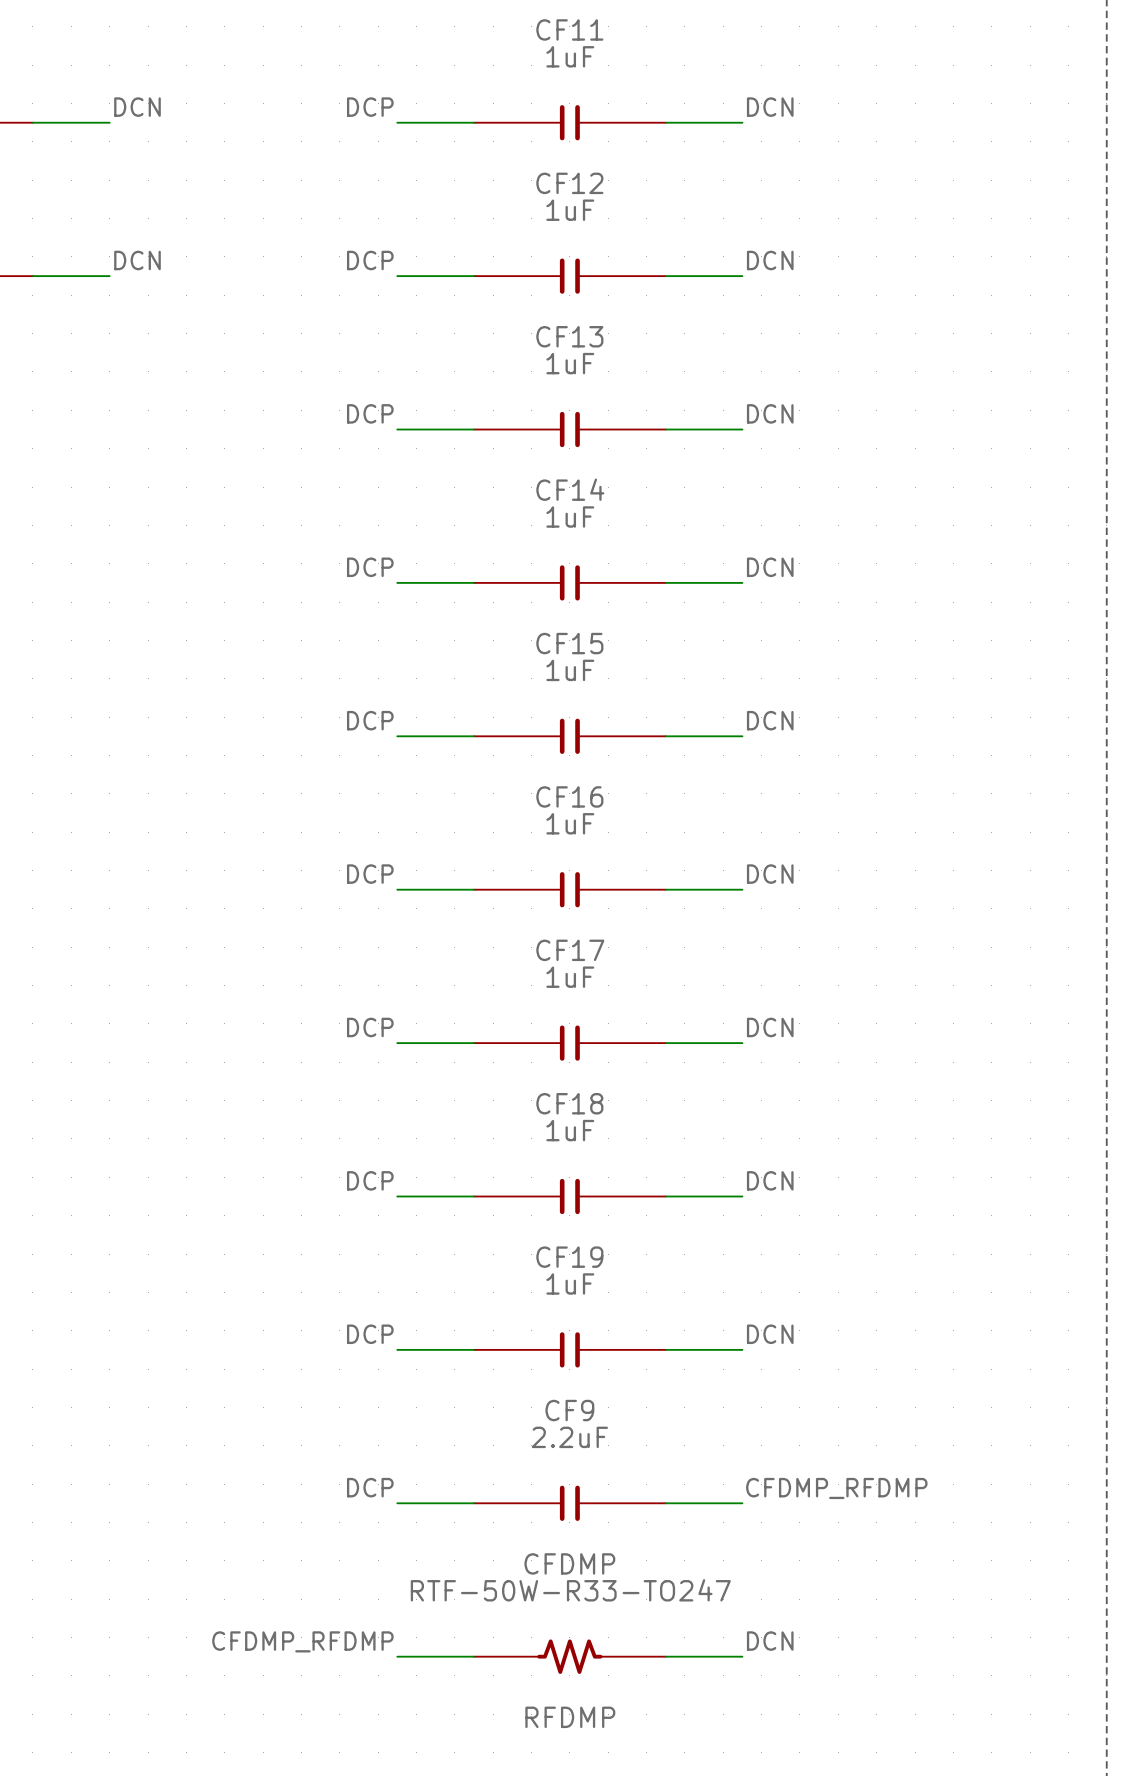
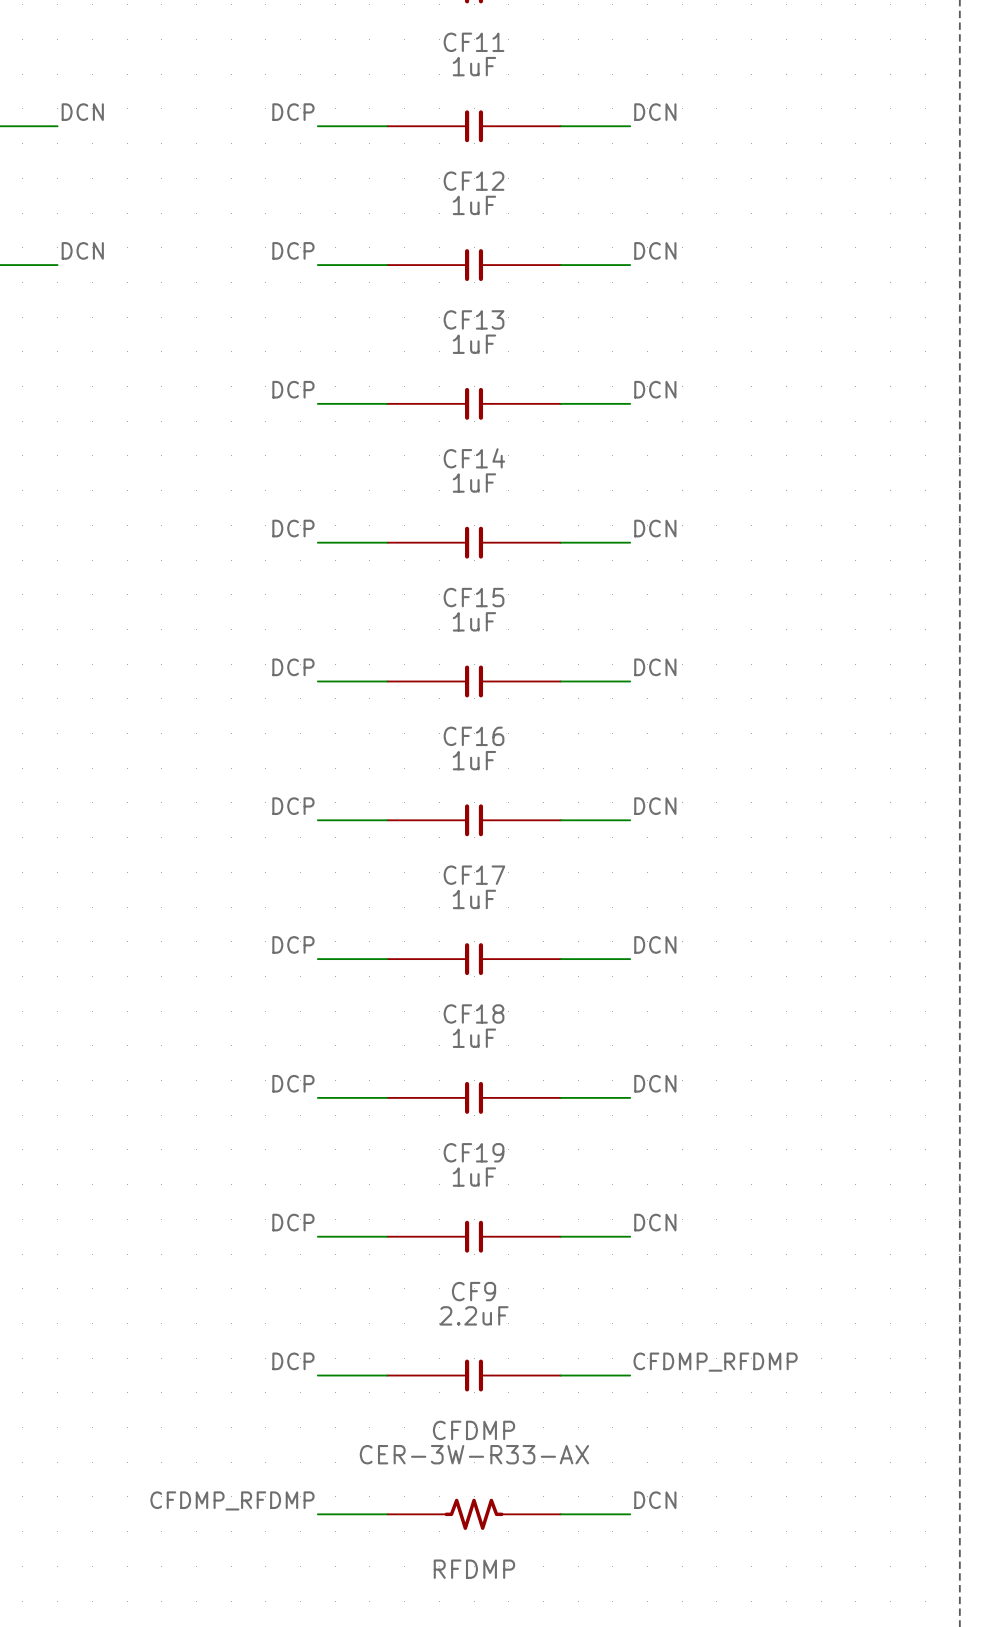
RFDMP value: RTF-50W-R33-TO247 (570, 1590) -> CER-3W-R33-AX (474, 1454)

